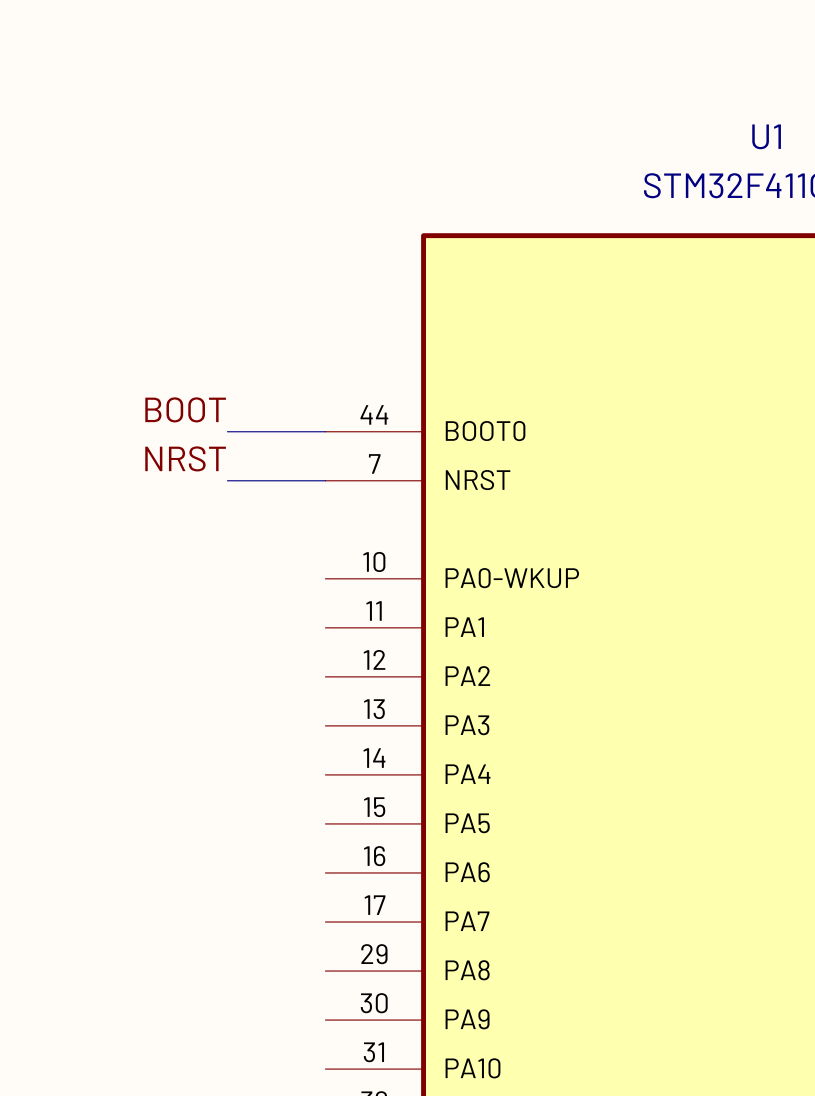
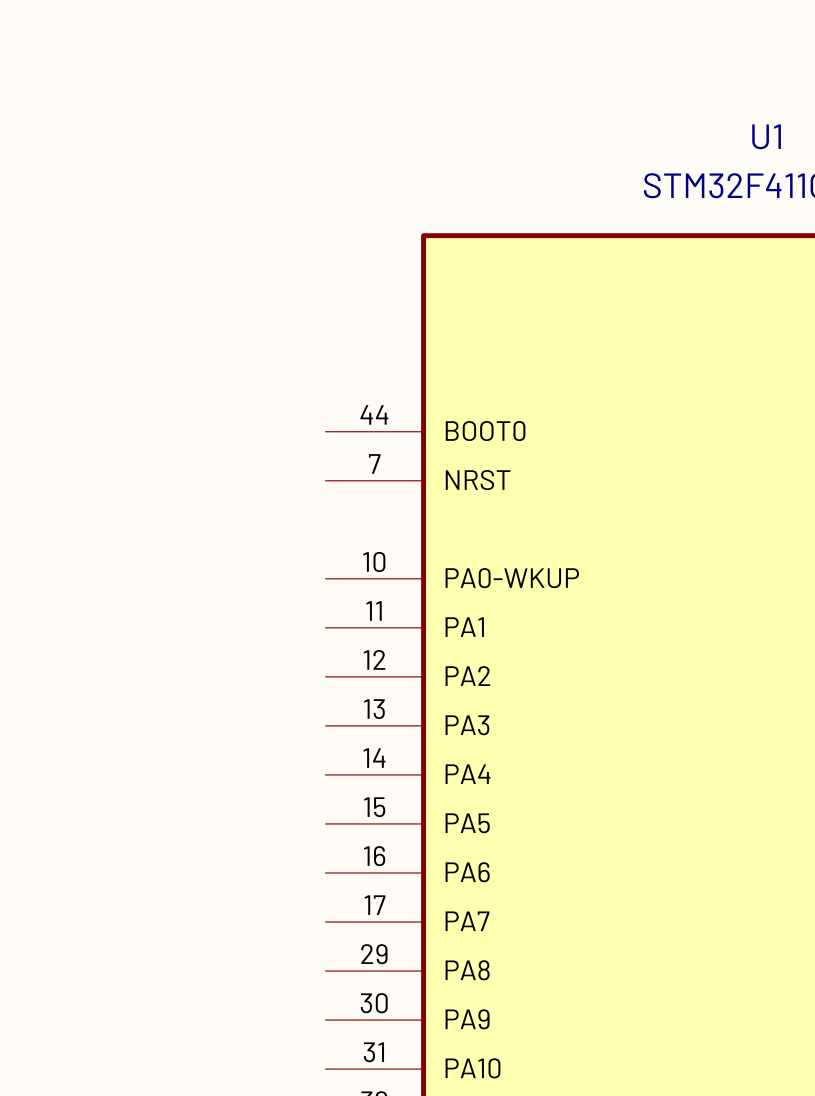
label: BOOT (185, 409) -> none
wire: (227, 431) (325, 431) -> none
label: NRST (185, 458) -> none
wire: (227, 480) (325, 480) -> none

